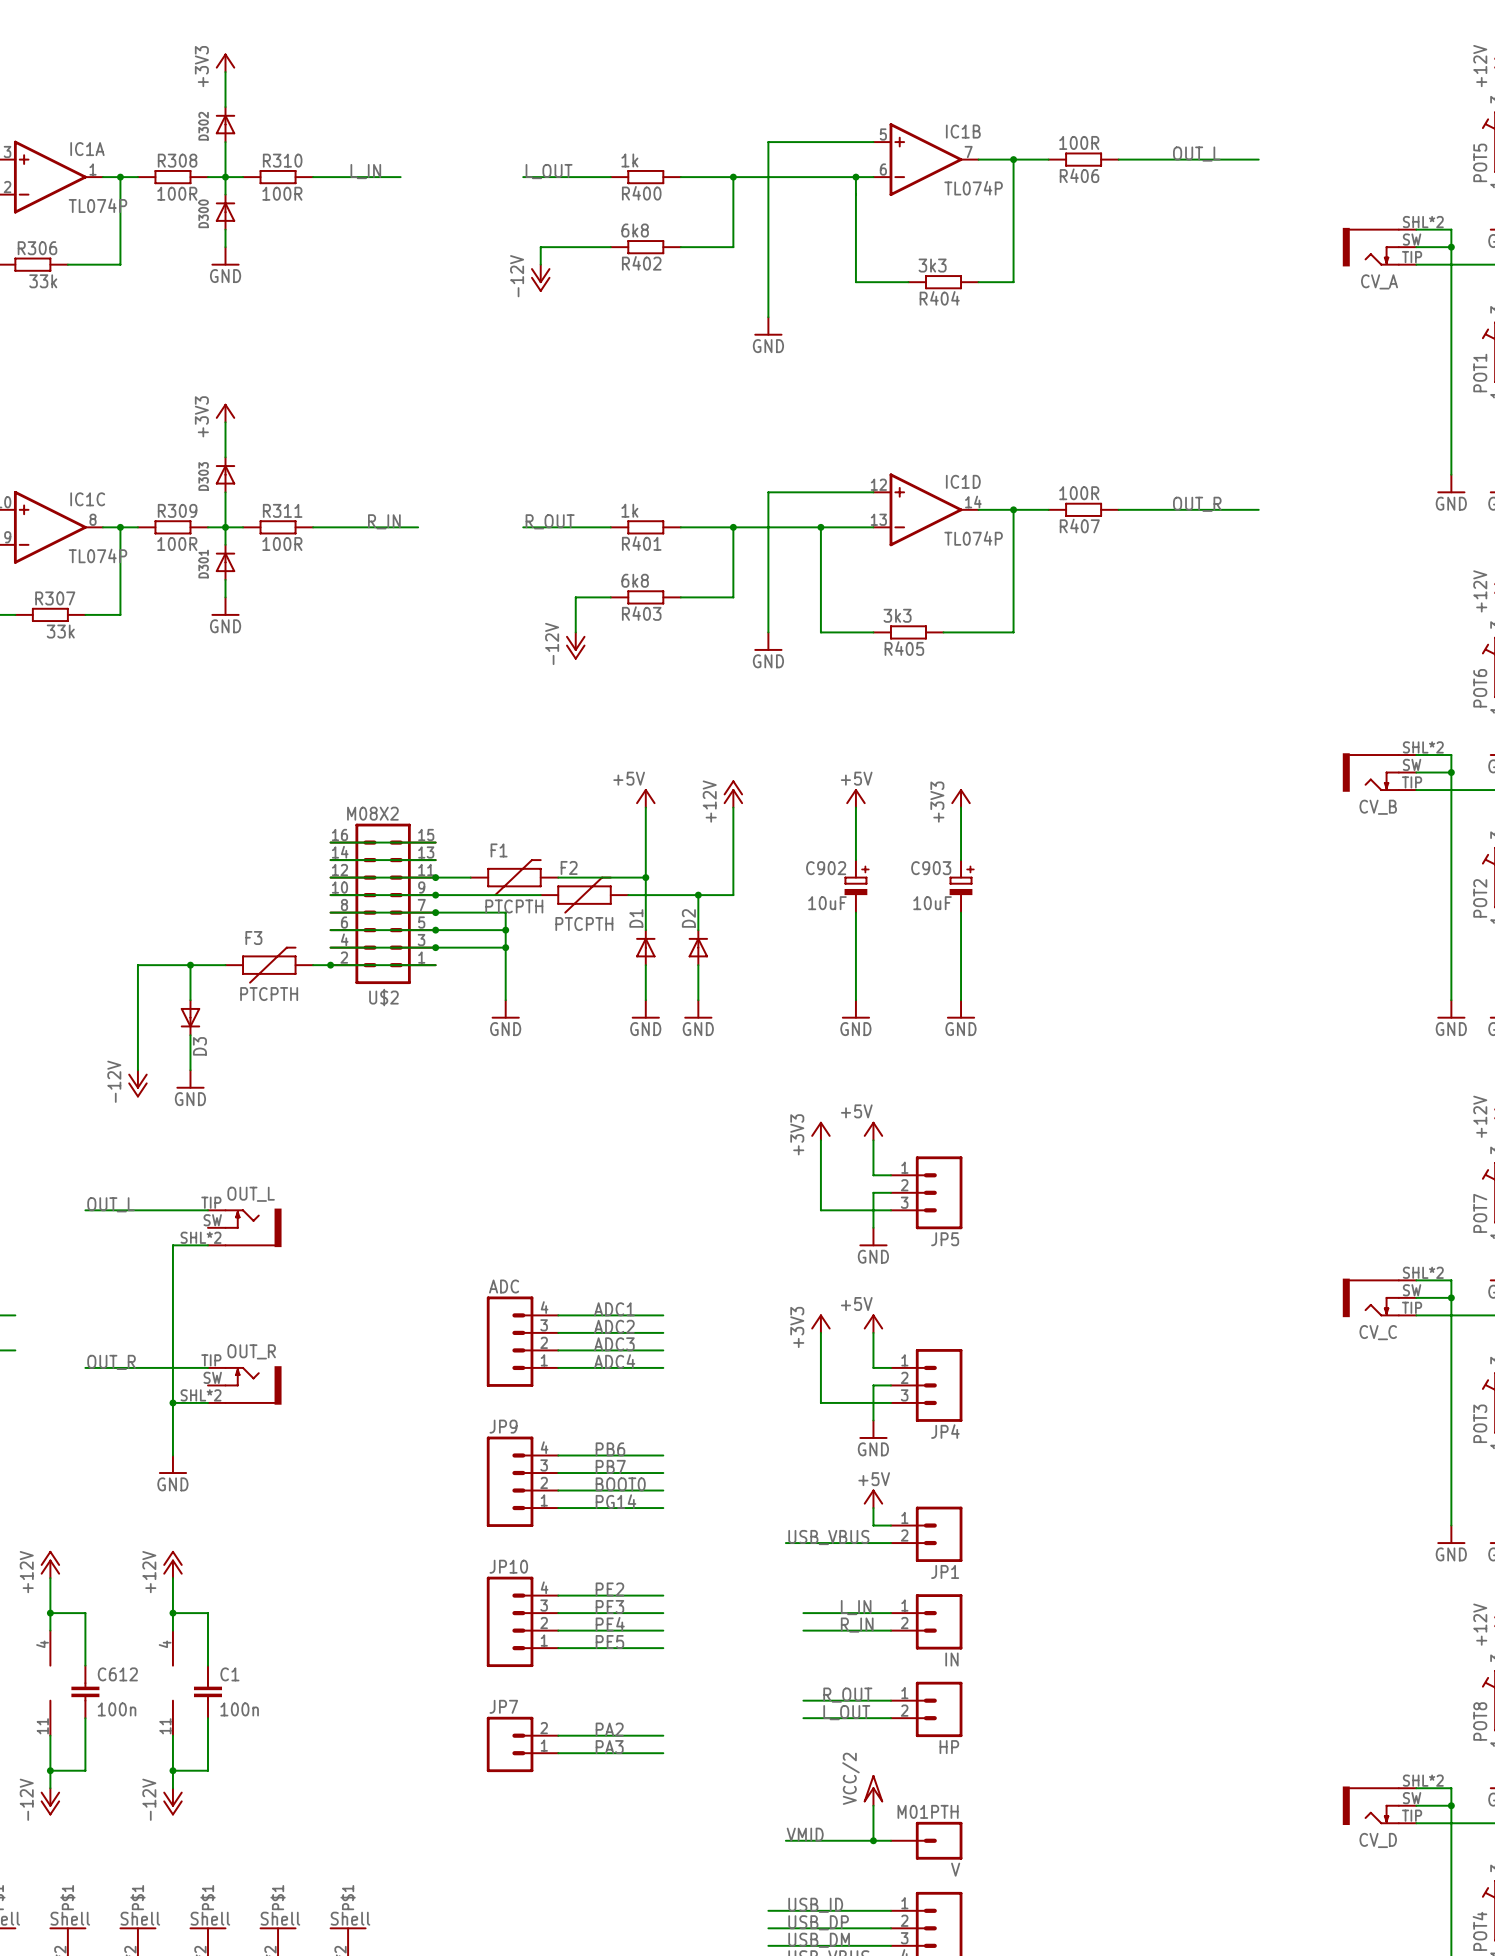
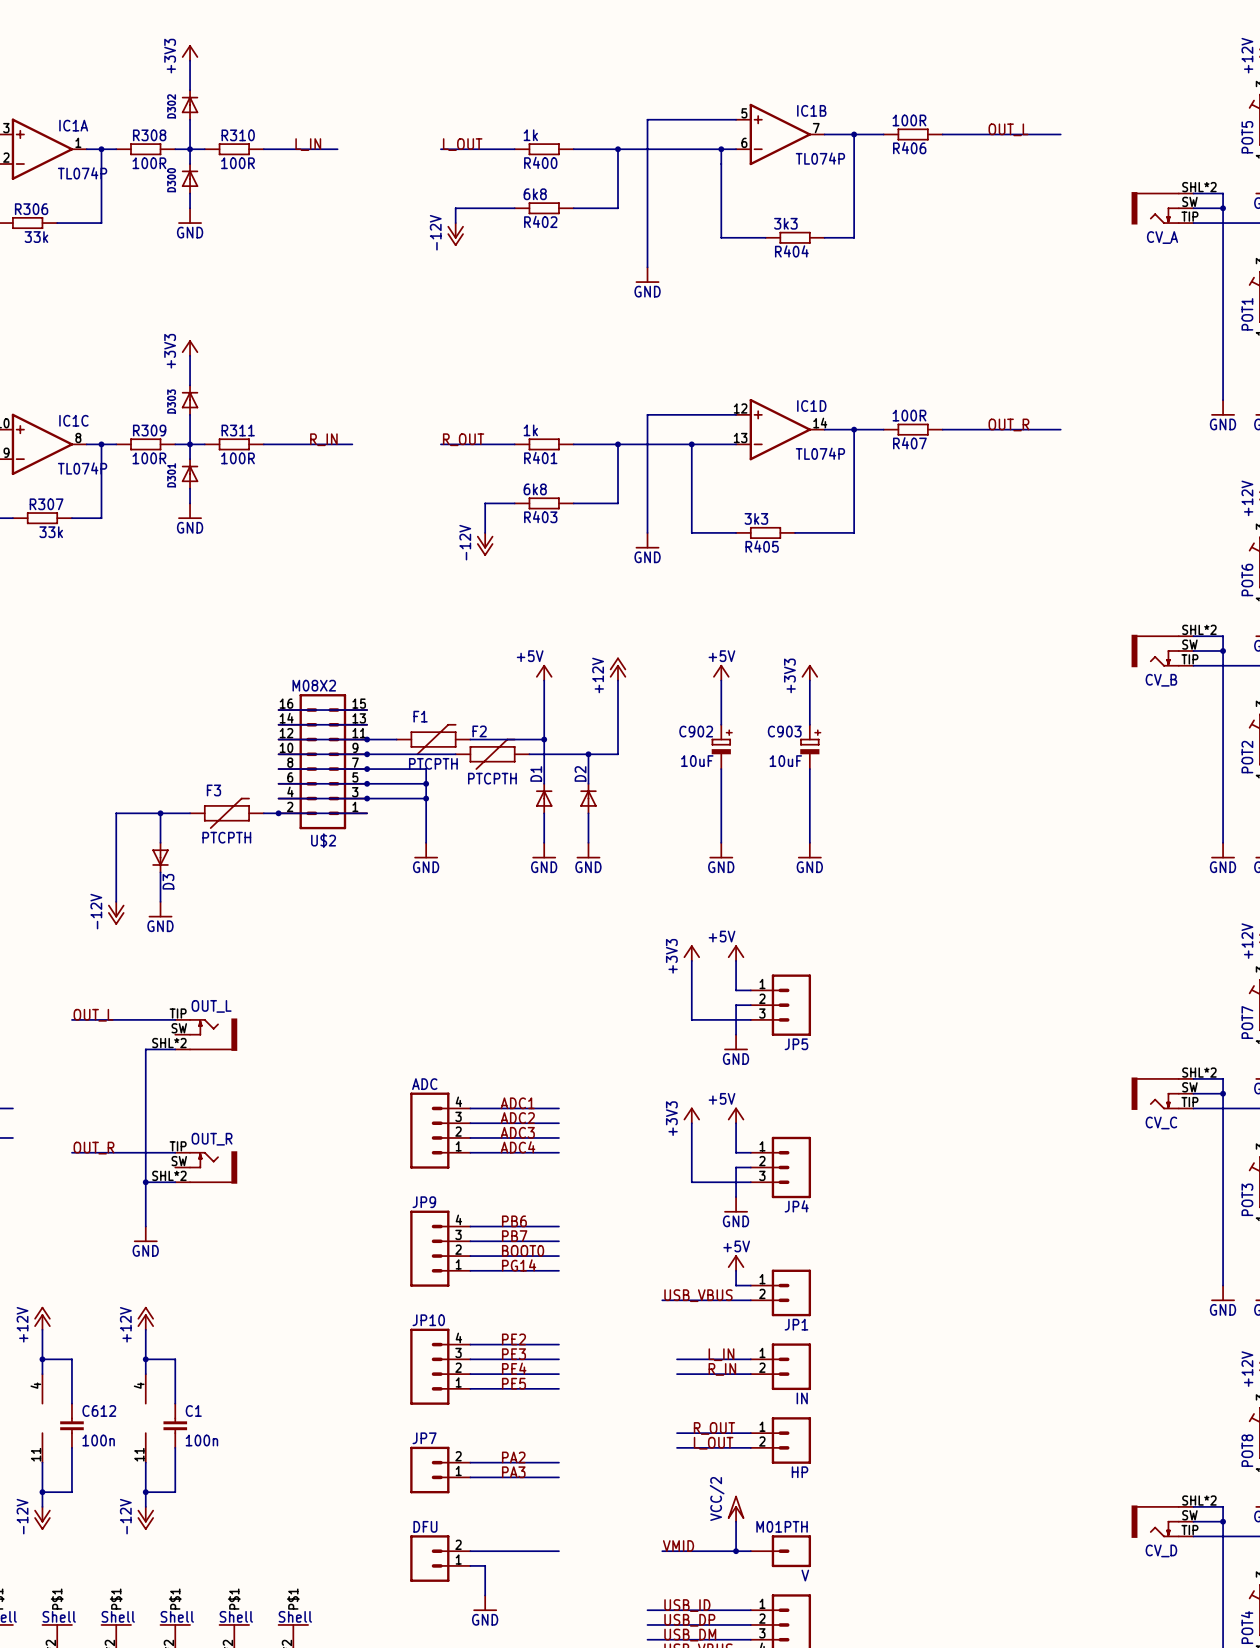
wire: none -> (470, 1551) (558, 1551)
DFU: none -> (440, 1558)
wire: none -> (470, 1565) (485, 1565) (485, 1595)
power symbol: none -> GND (485, 1603)

